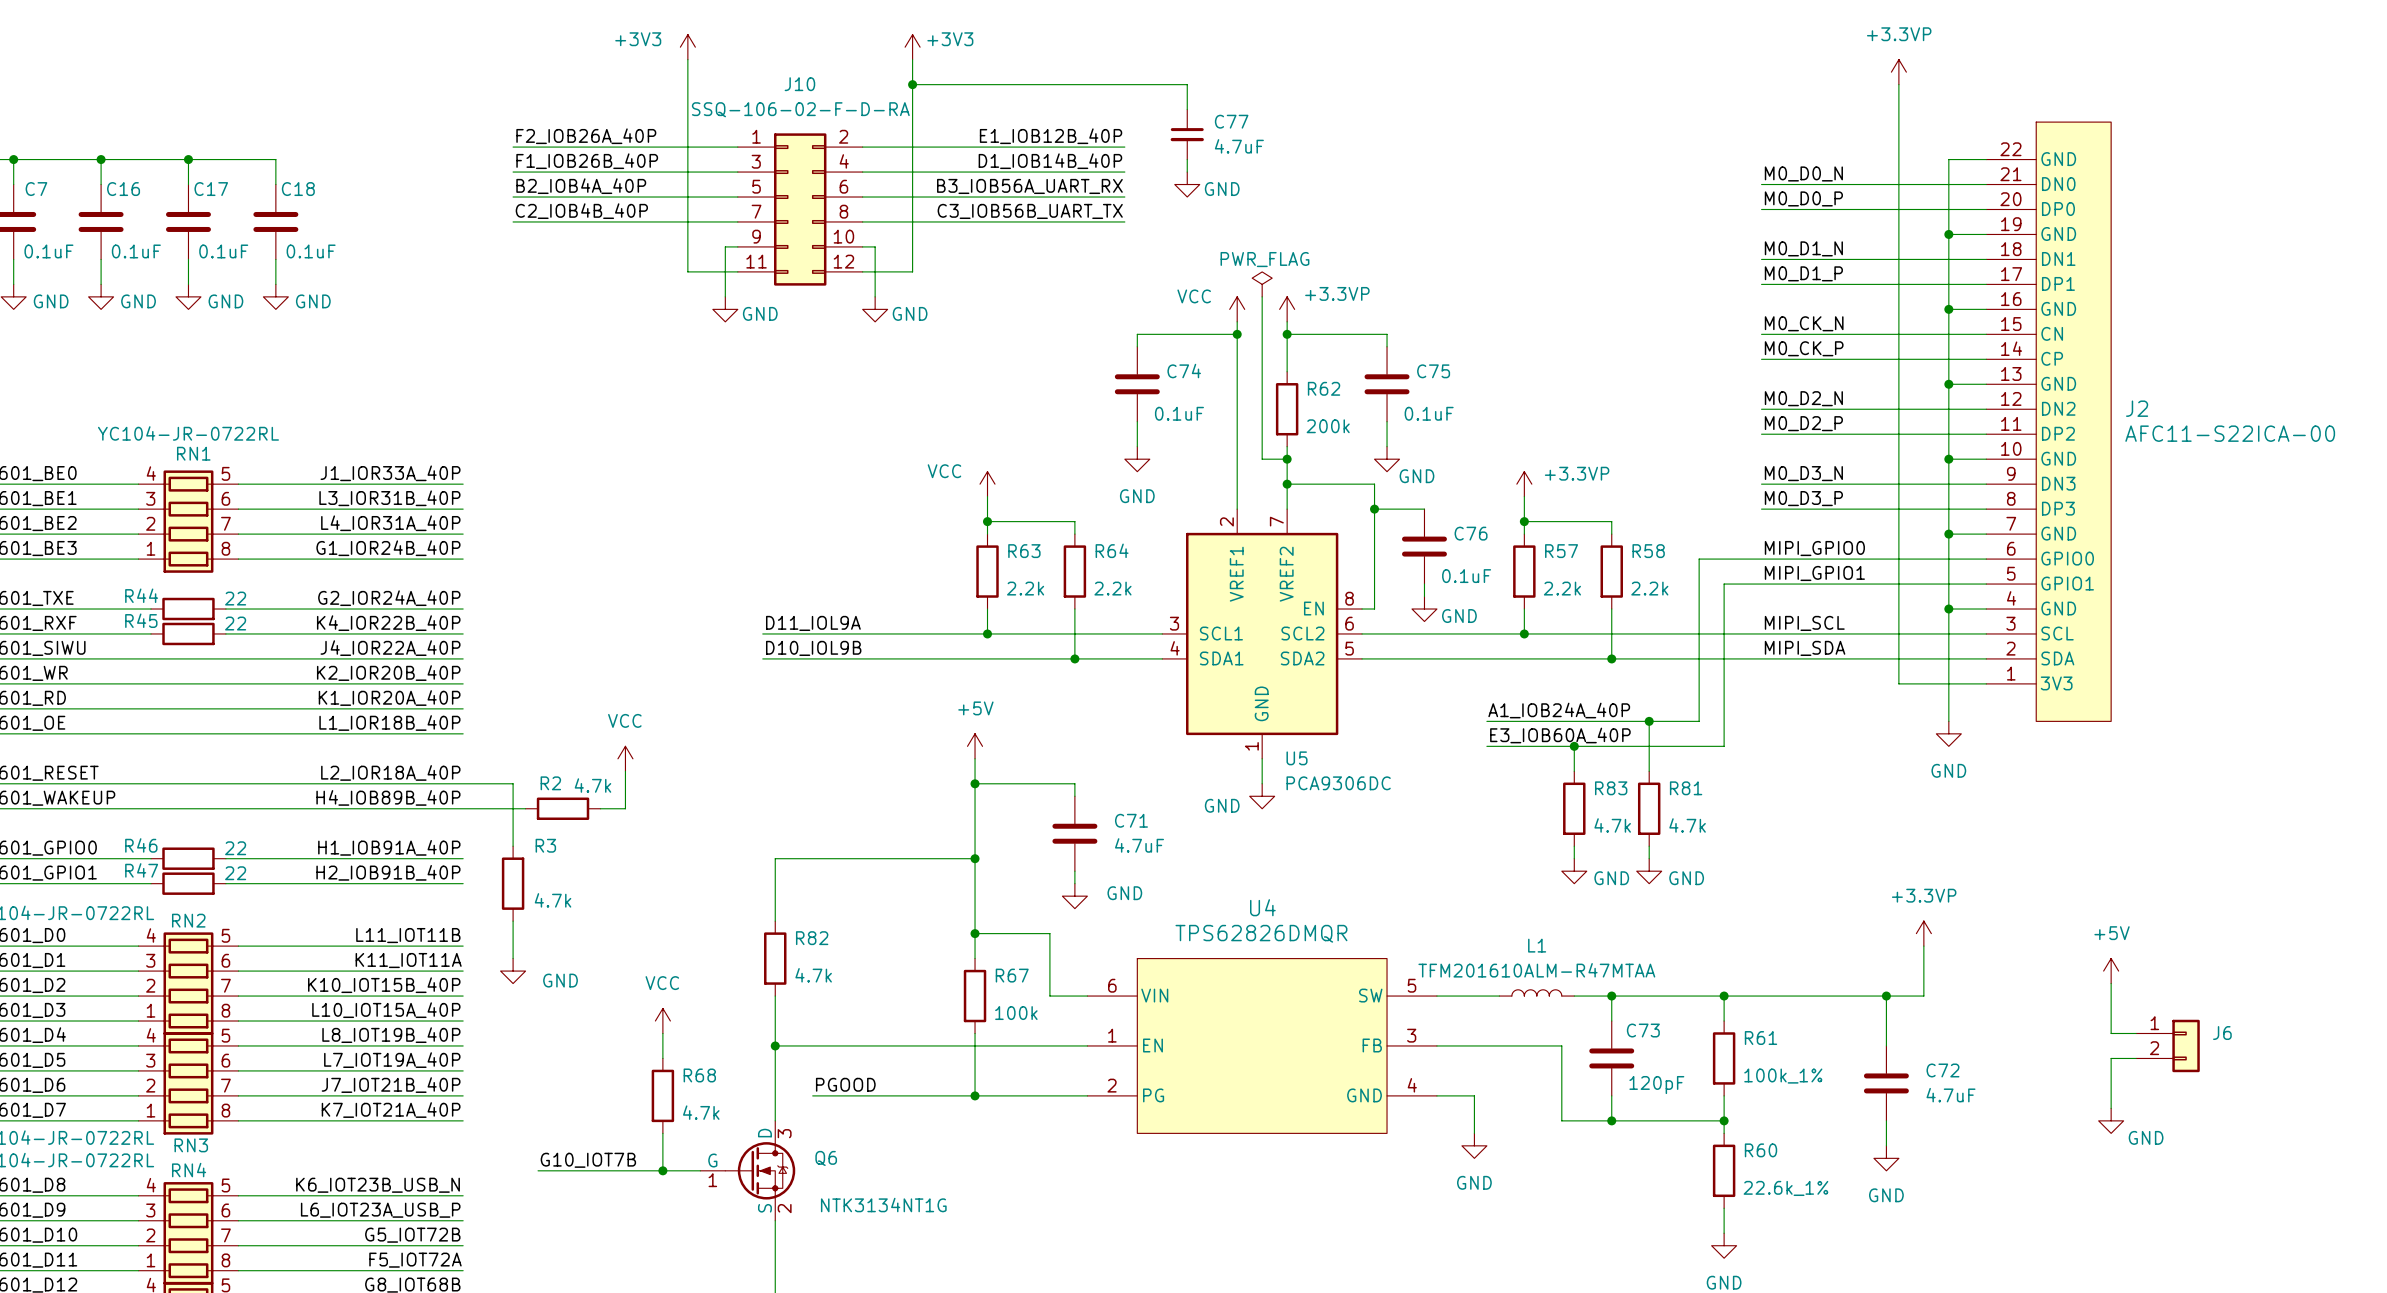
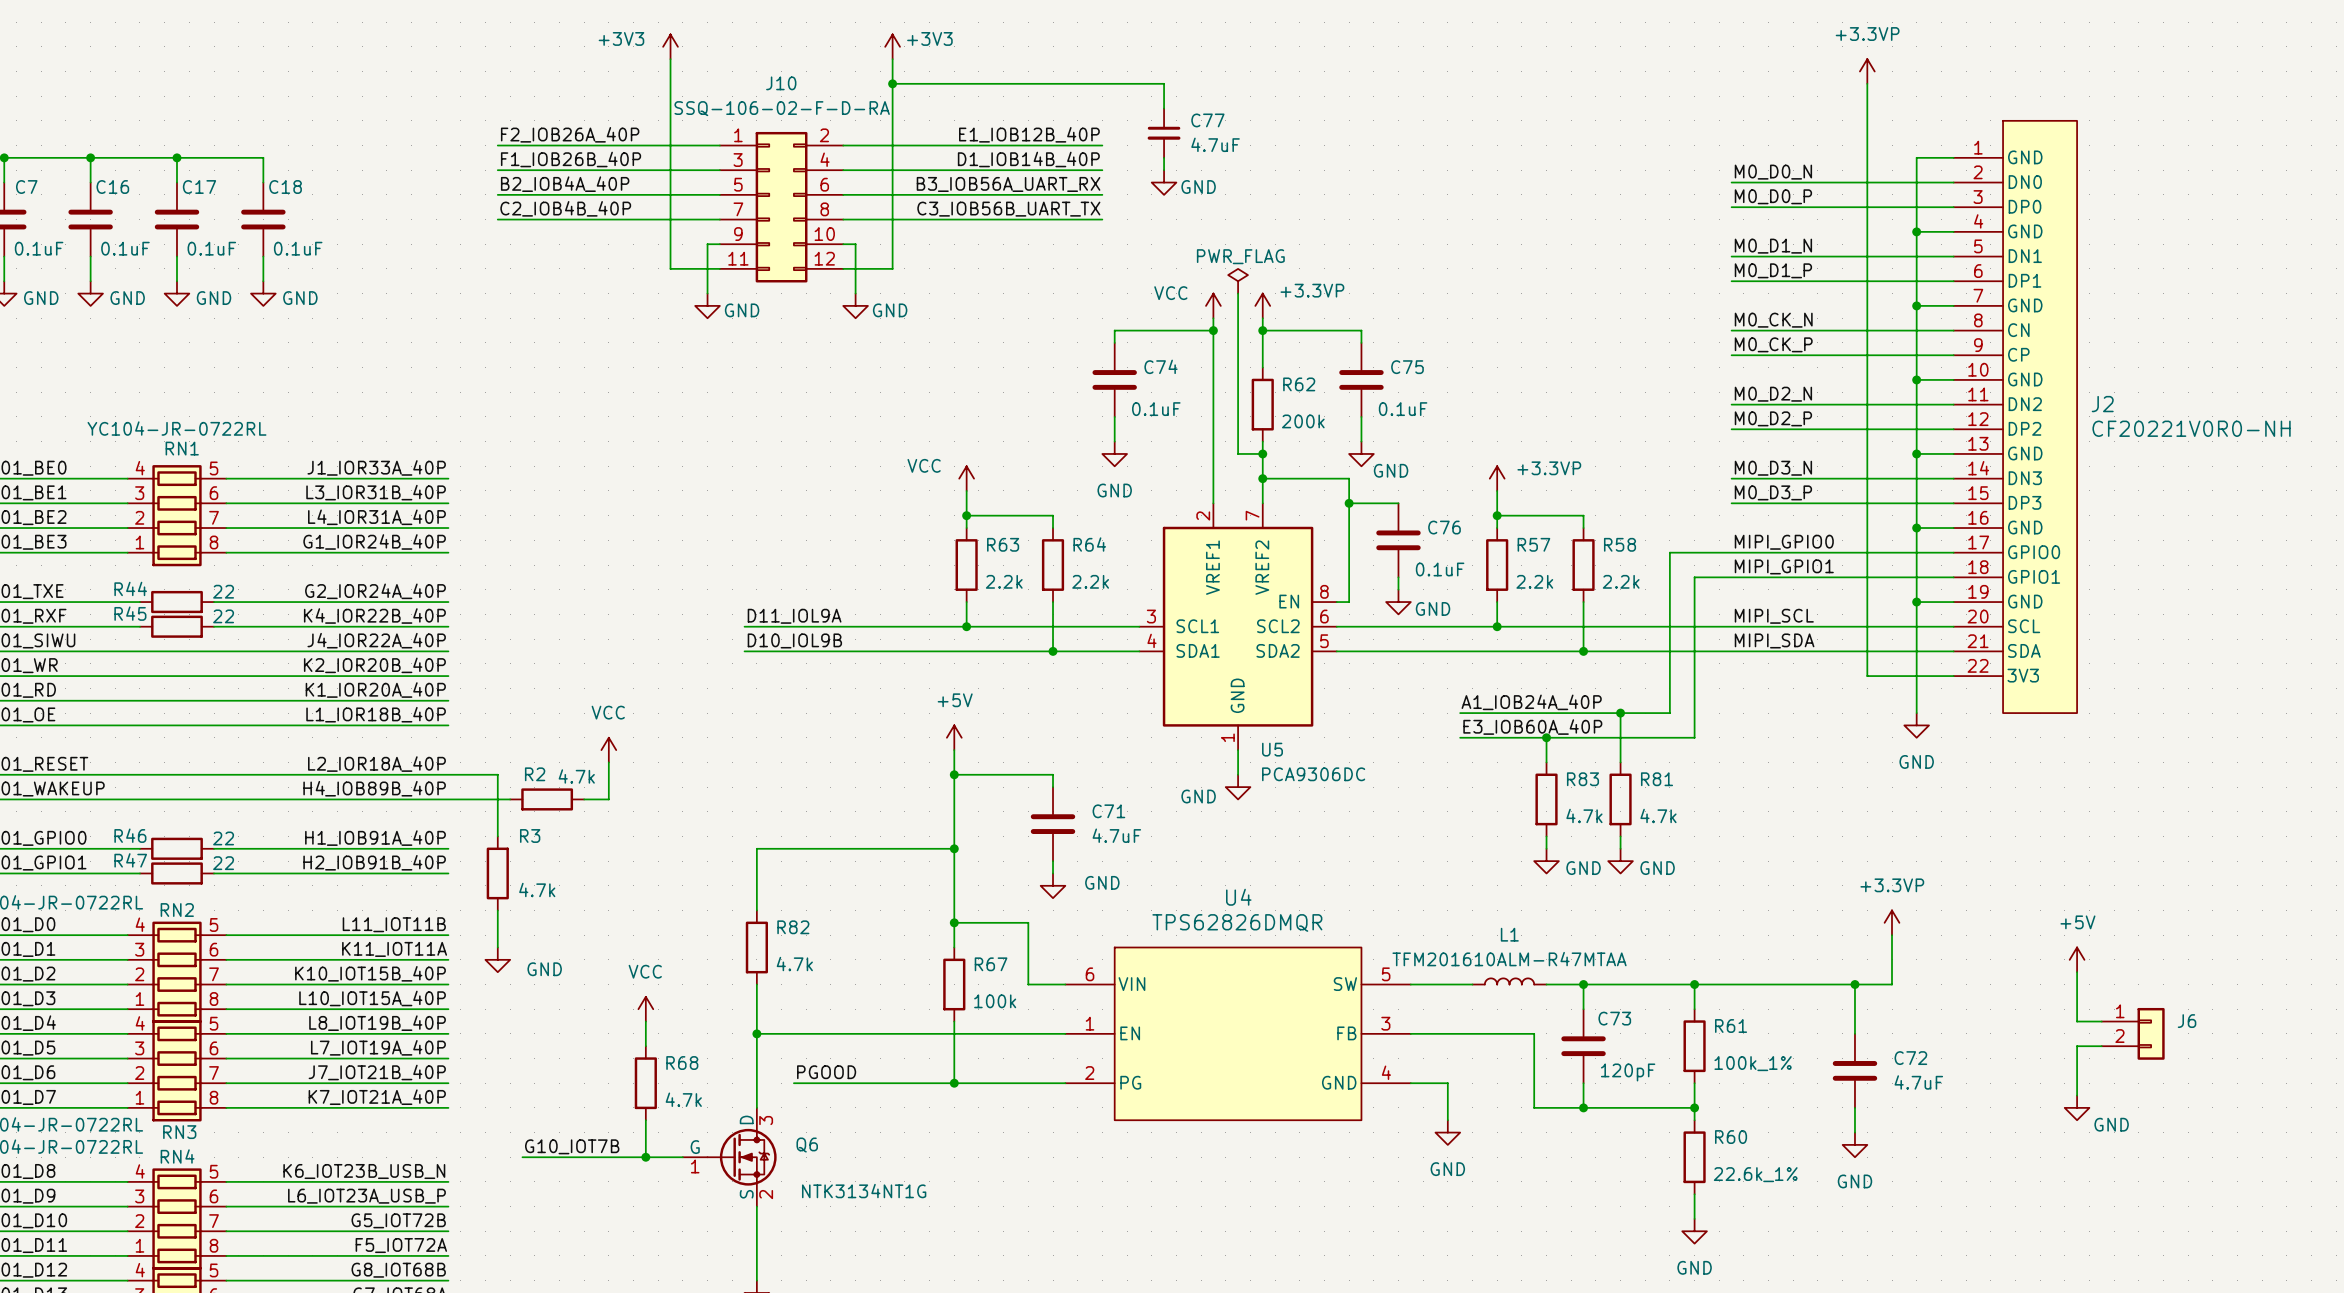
J2 symbol: [1986, 122, 2112, 722] -> [1953, 120, 2078, 714]
J2 value: AFC11-S22ICA-00 (2230, 433) -> CF20221V0R0-NH (2191, 428)

